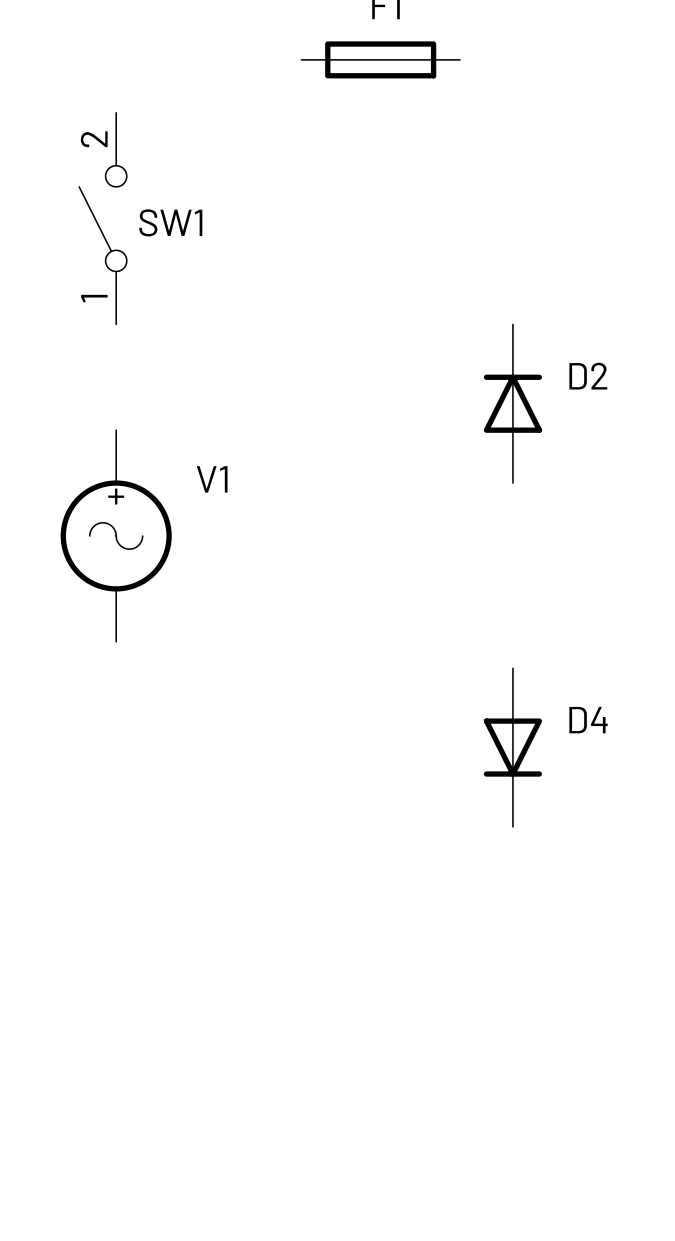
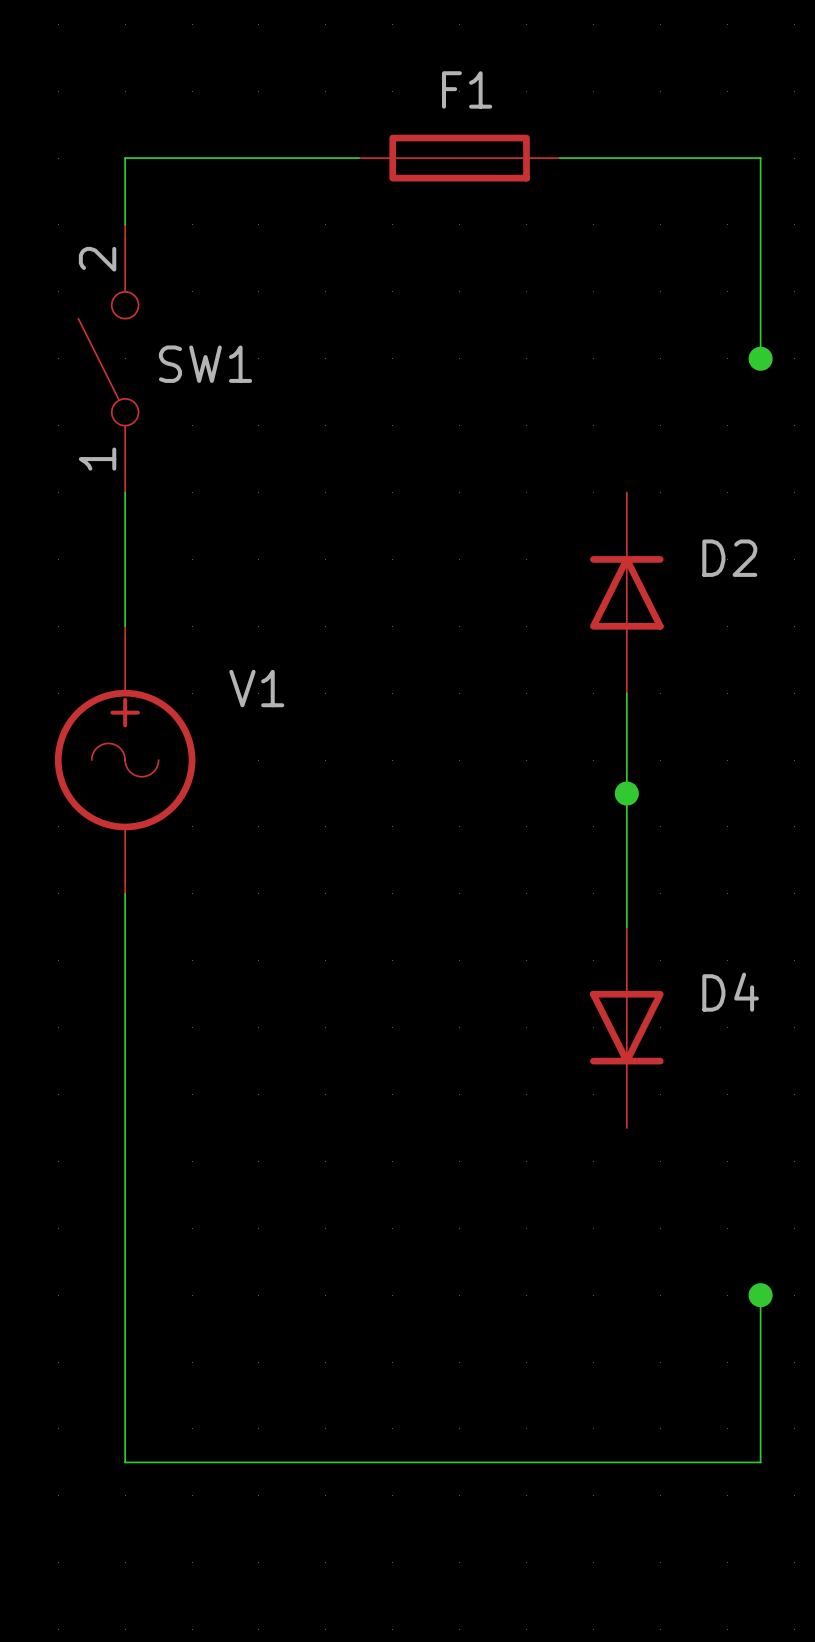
wire: none -> (359, 158) (125, 158) (125, 224)
wire: none -> (559, 158) (760, 158) (760, 358)
junction: none -> (760, 358)
wire: none -> (125, 492) (125, 626)
wire: none -> (626, 693) (626, 927)
junction: none -> (626, 793)
wire: none -> (125, 893) (125, 1462) (760, 1462) (760, 1295)
junction: none -> (760, 1295)

